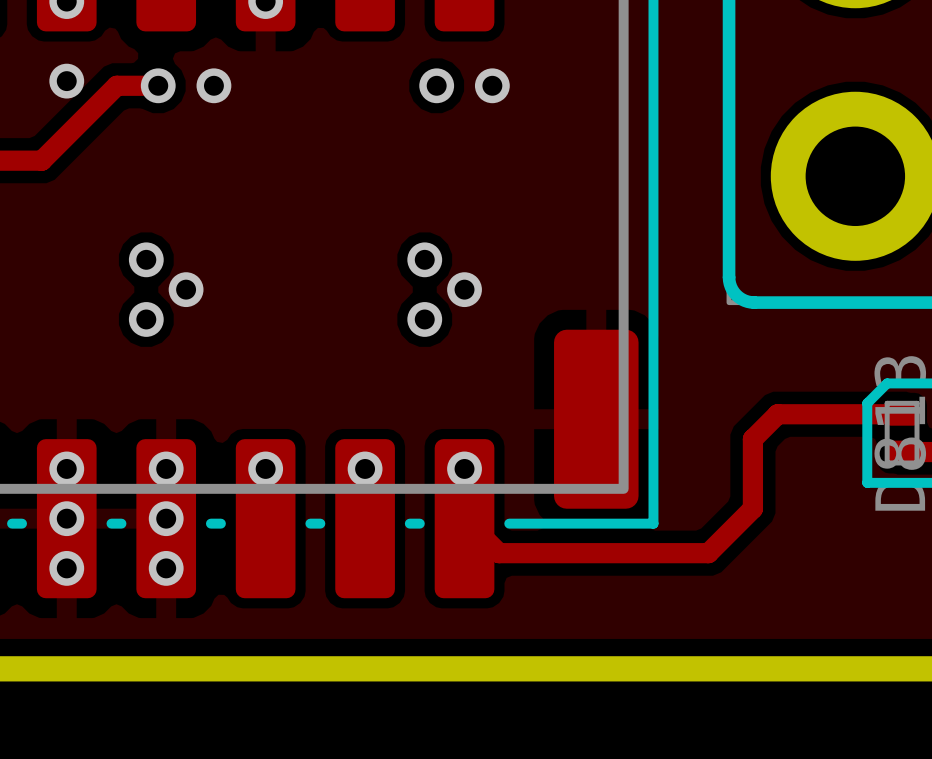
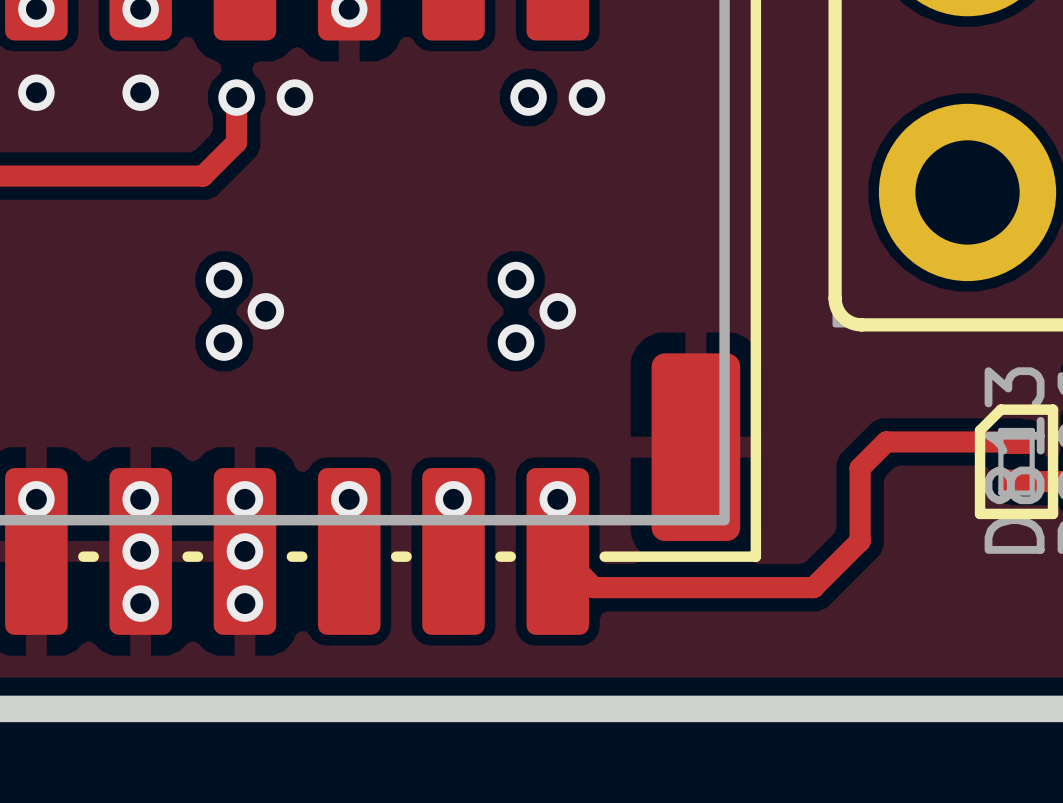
track: (158, 85) (116, 85) (41, 160) -> (236, 97) (236, 142) (202, 176) (114, 176)

